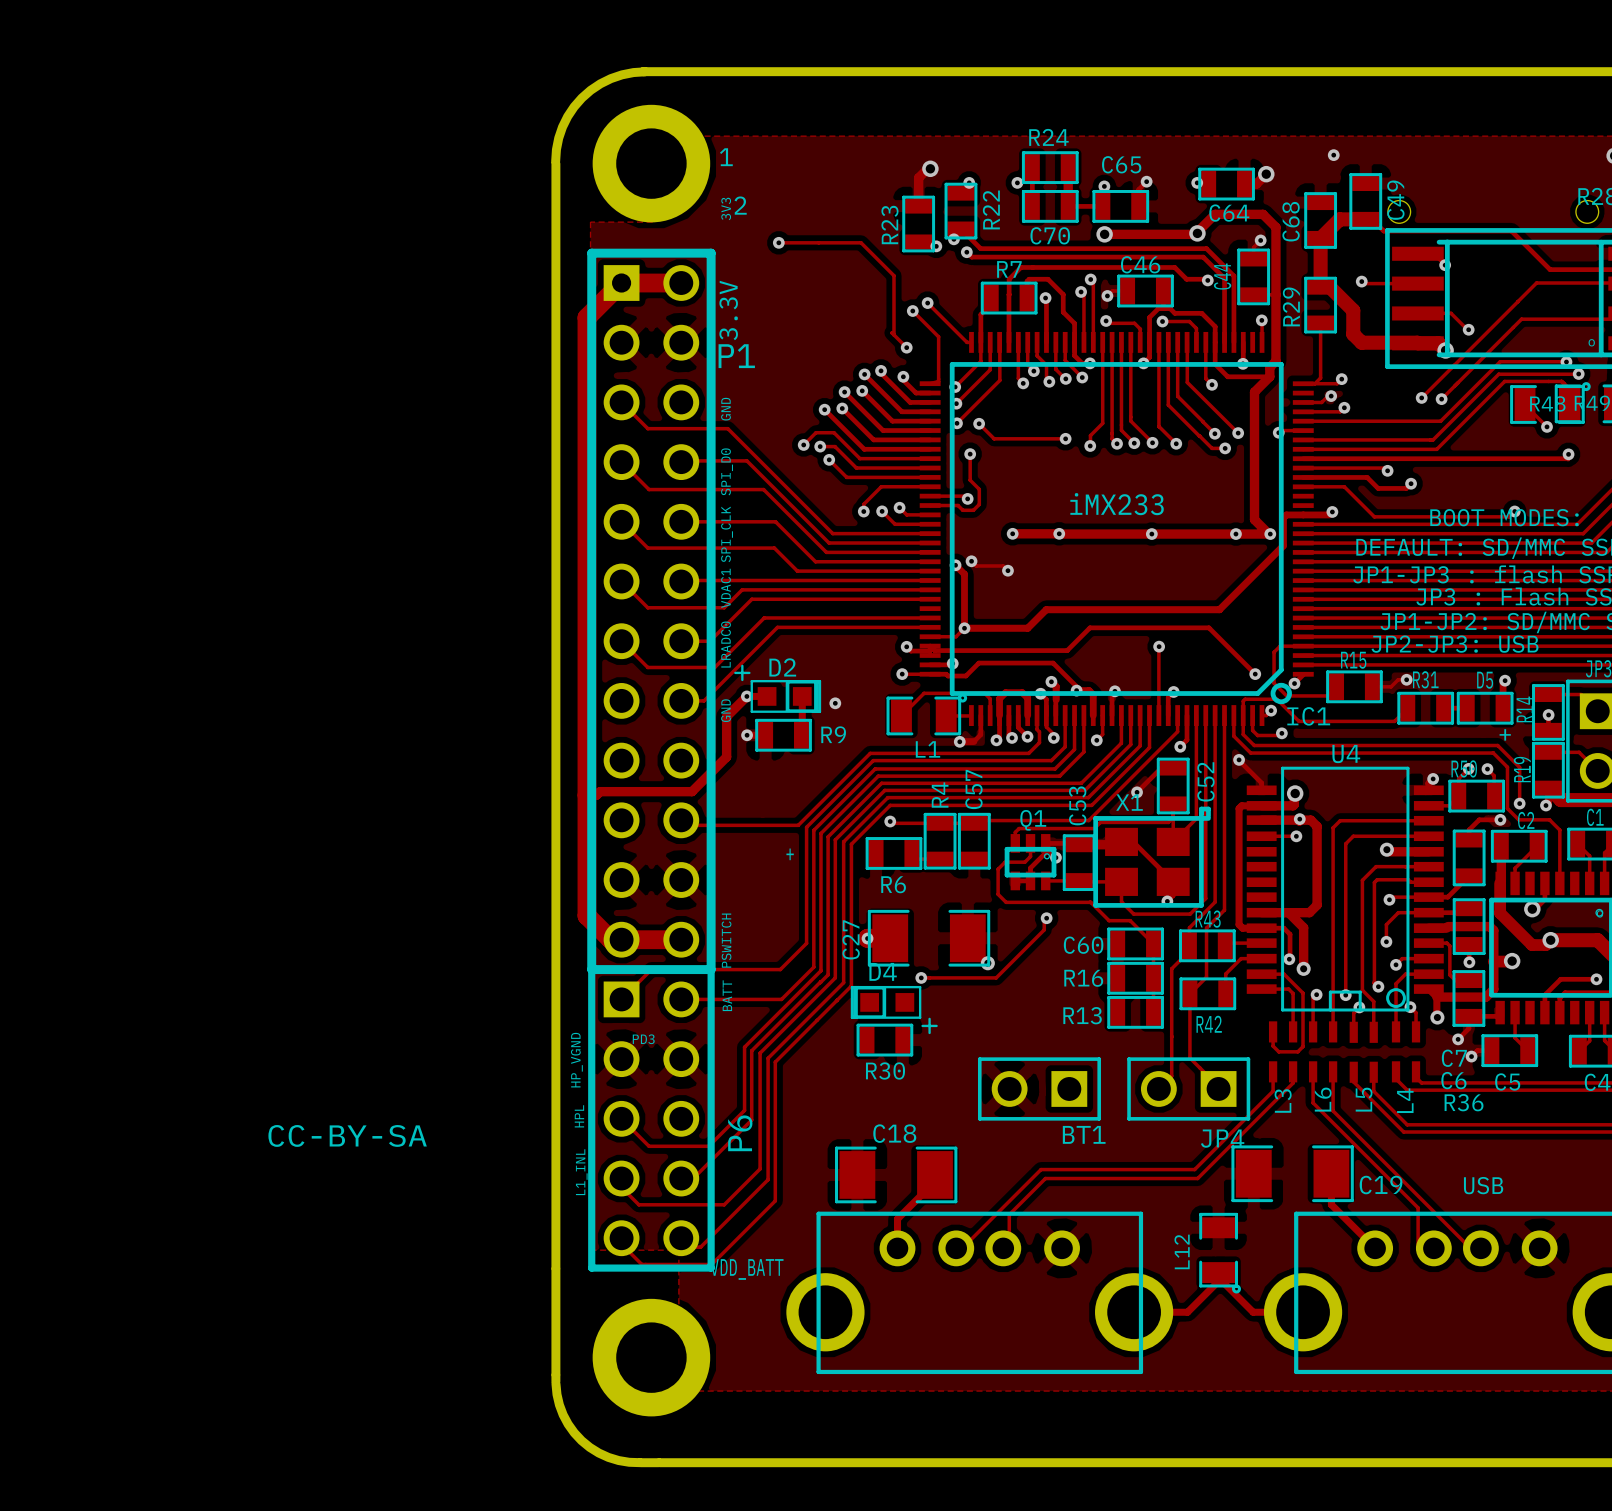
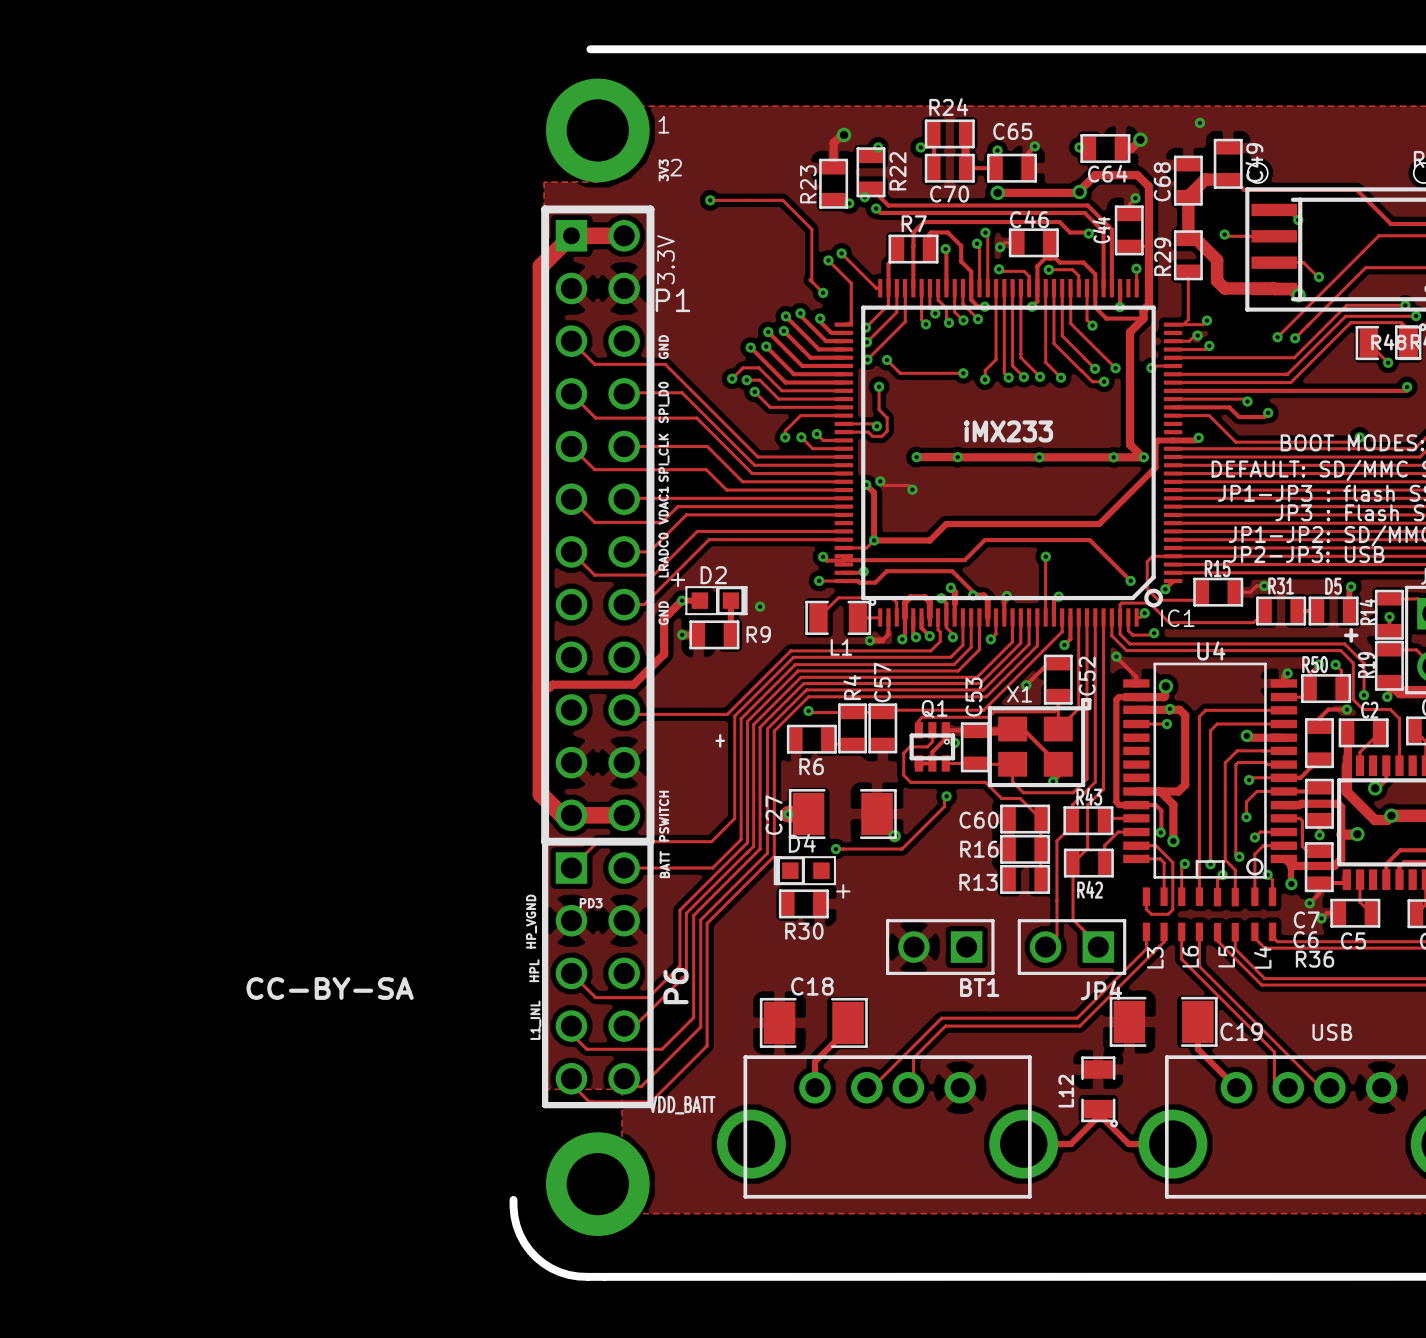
board edge: (645, 71) (633, 72) (610, 78) (600, 83) (581, 98) (567, 116) (562, 127) (556, 149) (555, 161) -> none
board edge: (555, 163) (555, 1268) -> none
board edge: (555, 1269) (555, 1374) -> none

